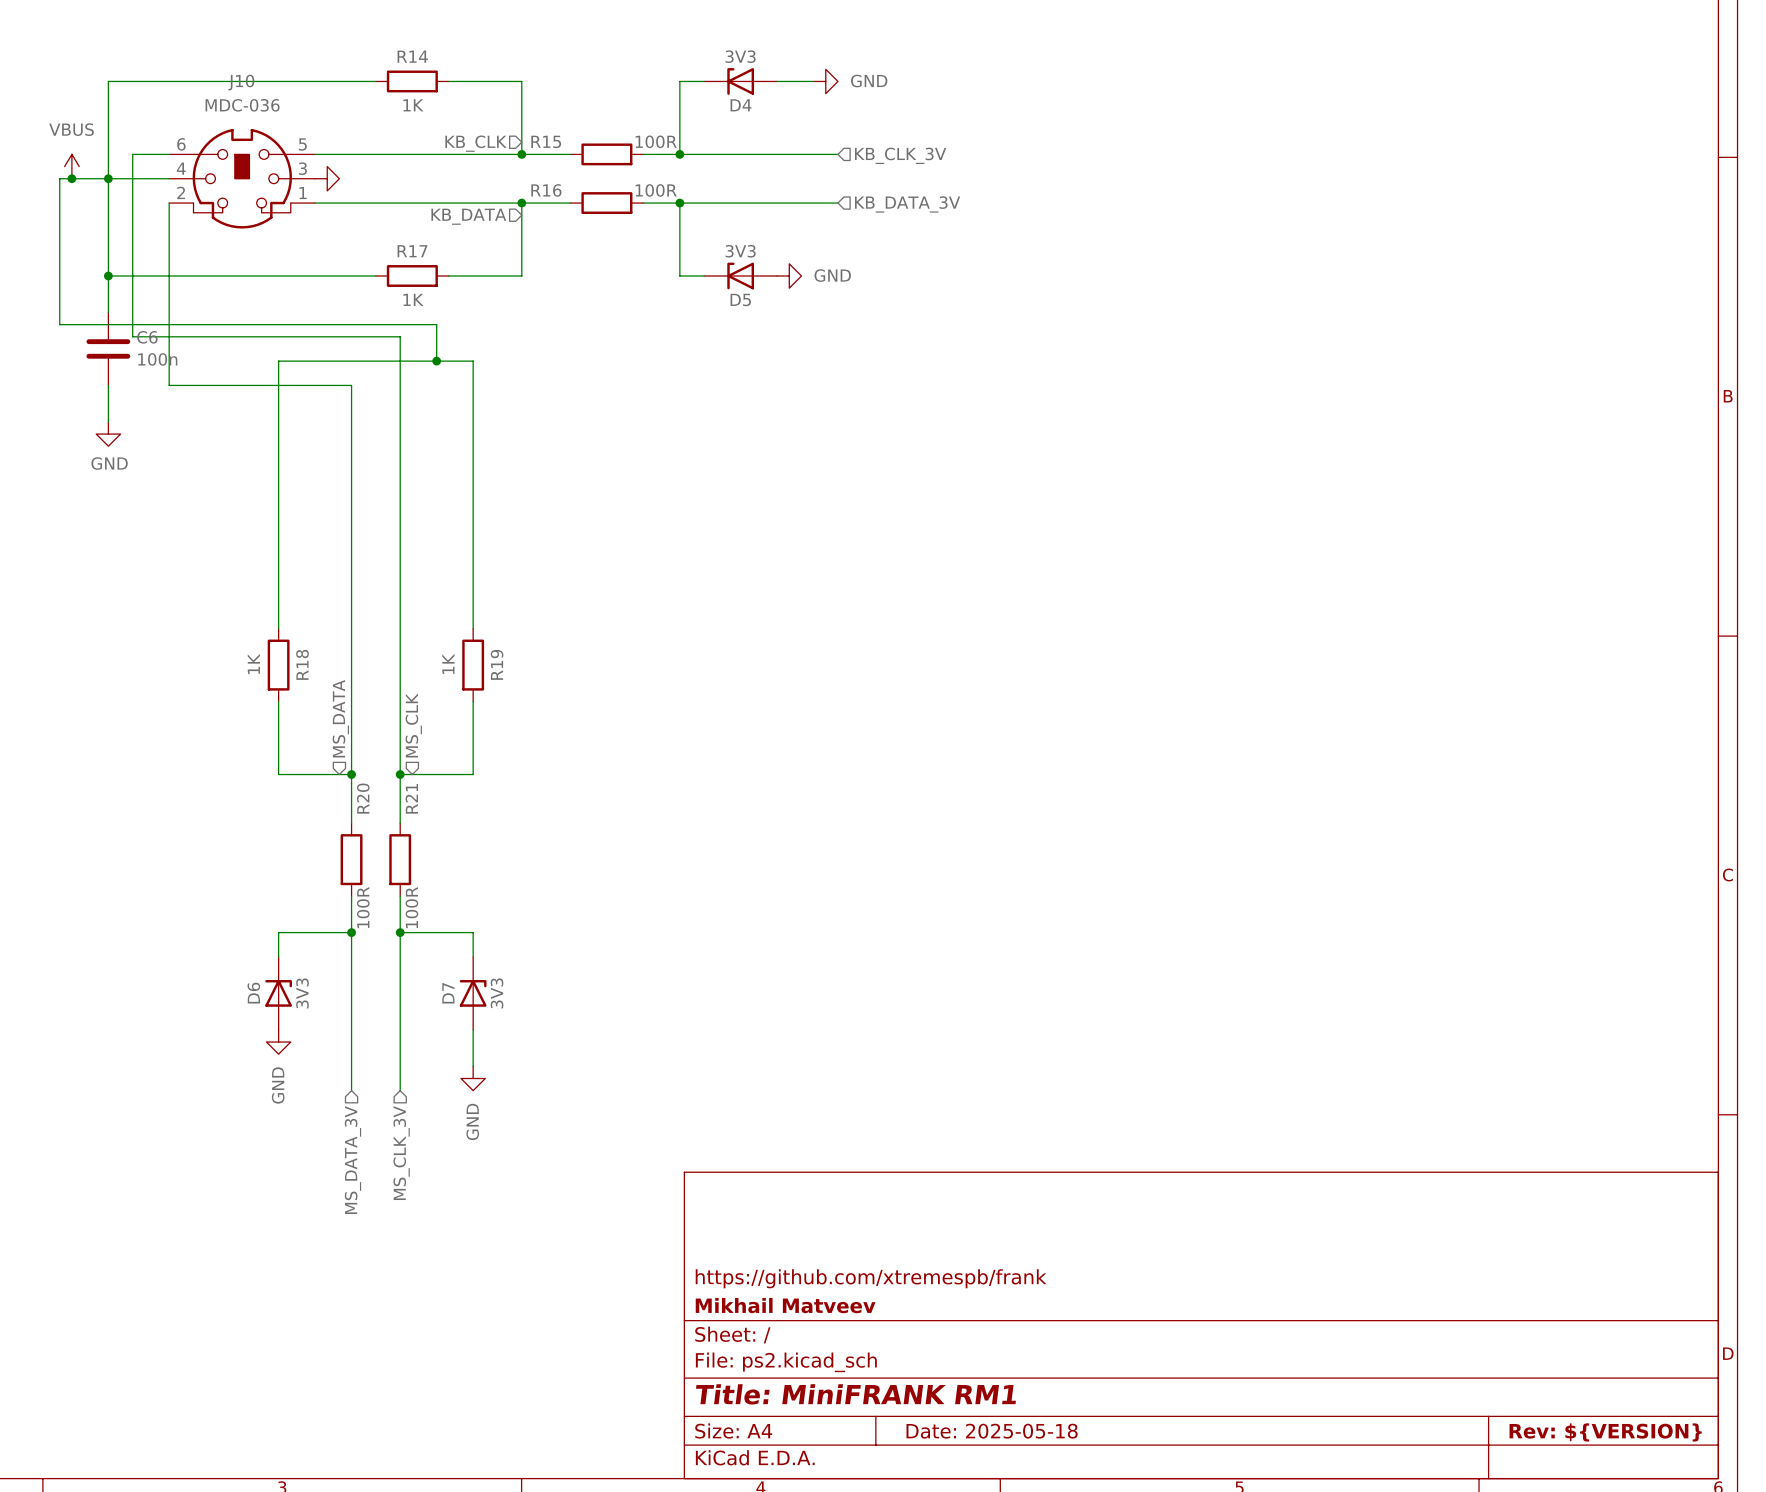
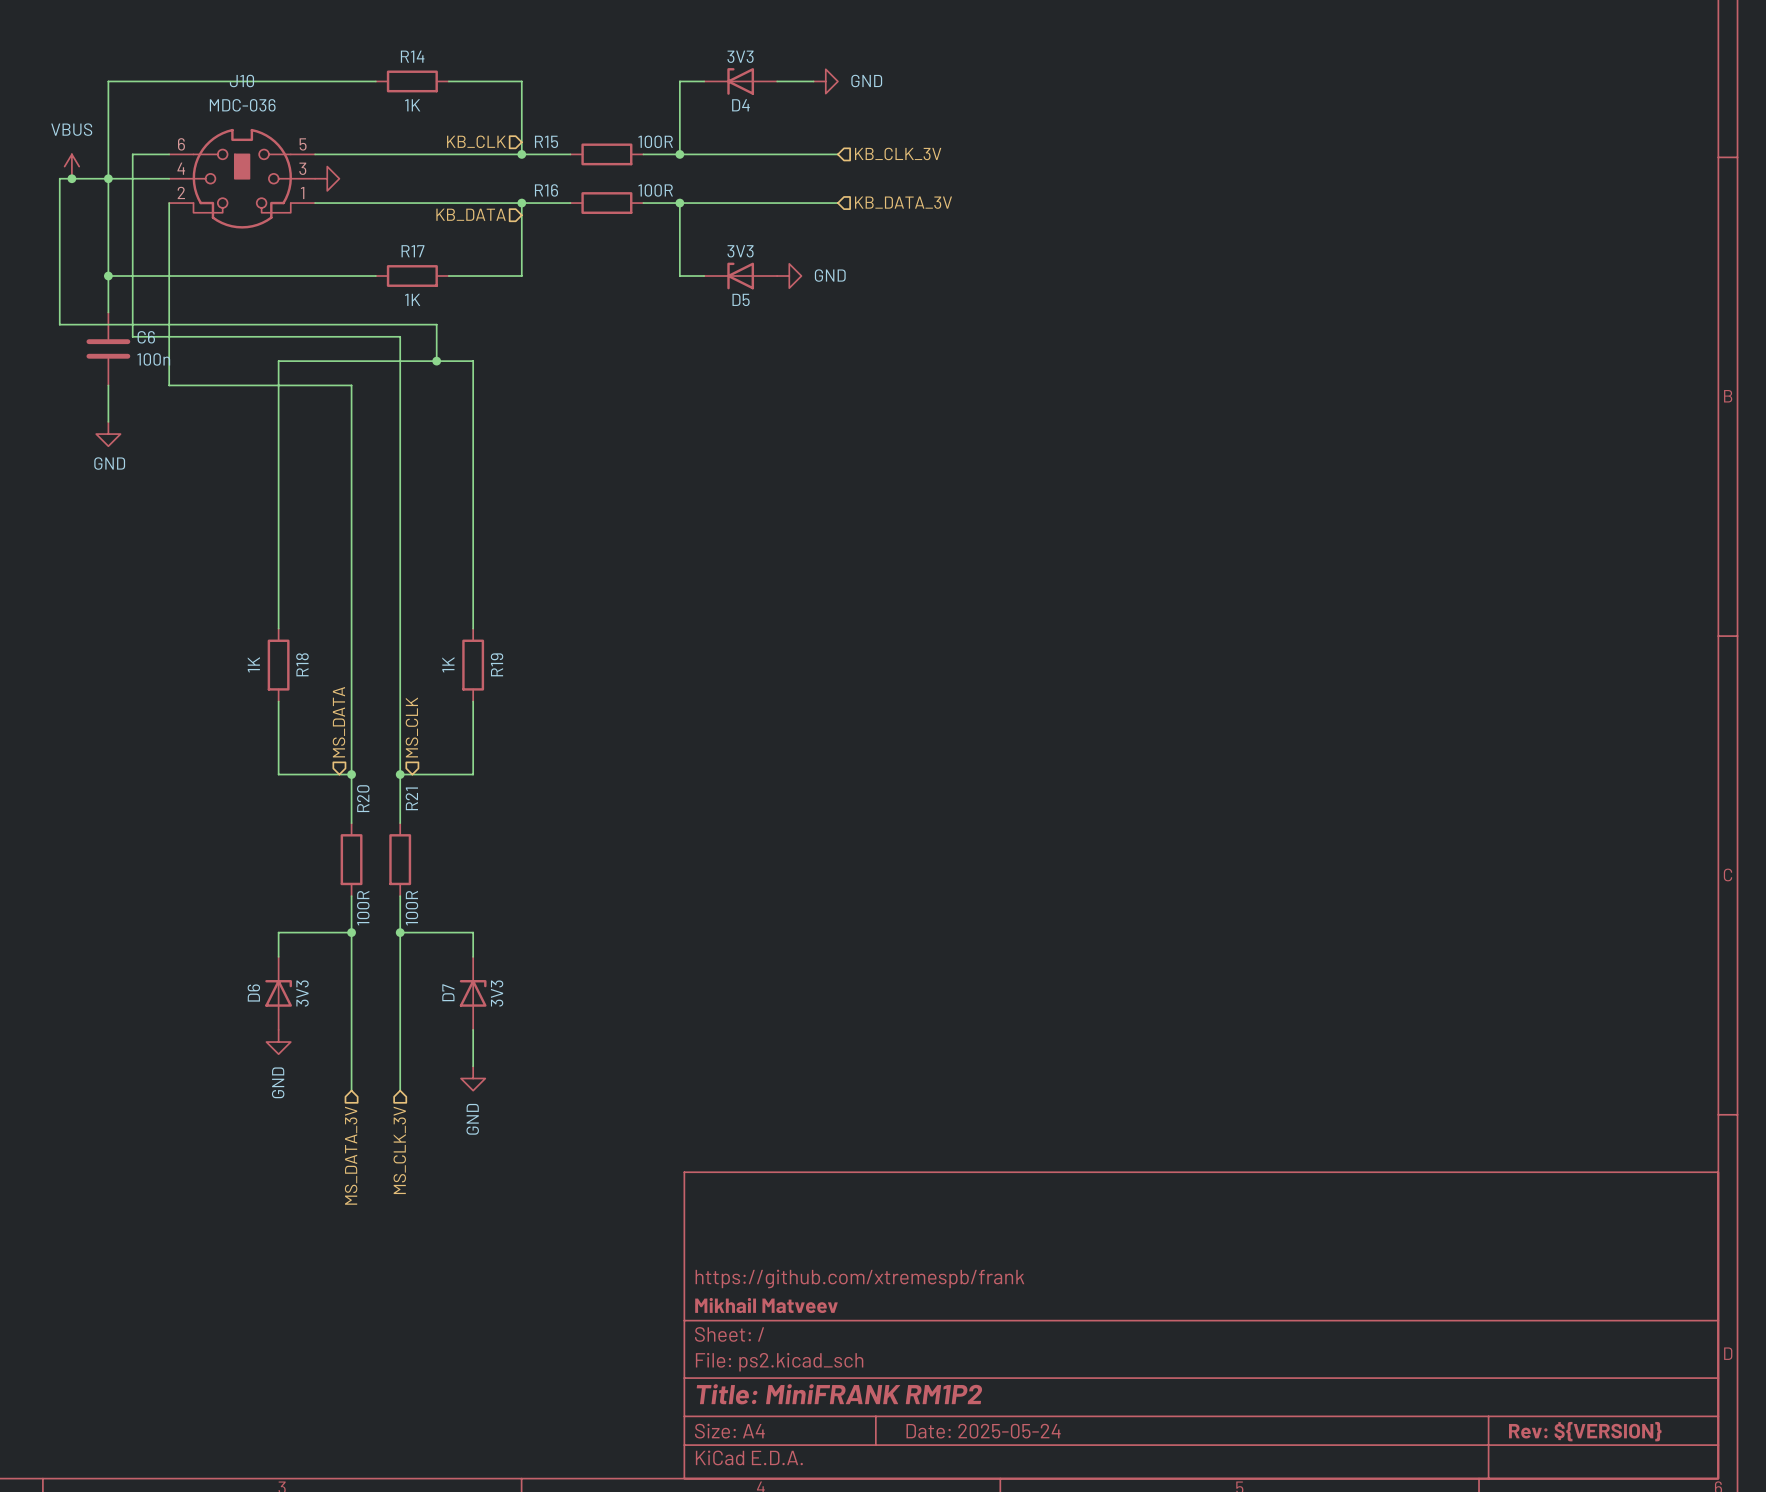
title block: Title: MiniFRANK RM1 (855, 1394) -> Title: MiniFRANK RM1P2 (839, 1394)
title block: Date: 2025-05-18 (992, 1431) -> Date: 2025-05-24 (983, 1431)

